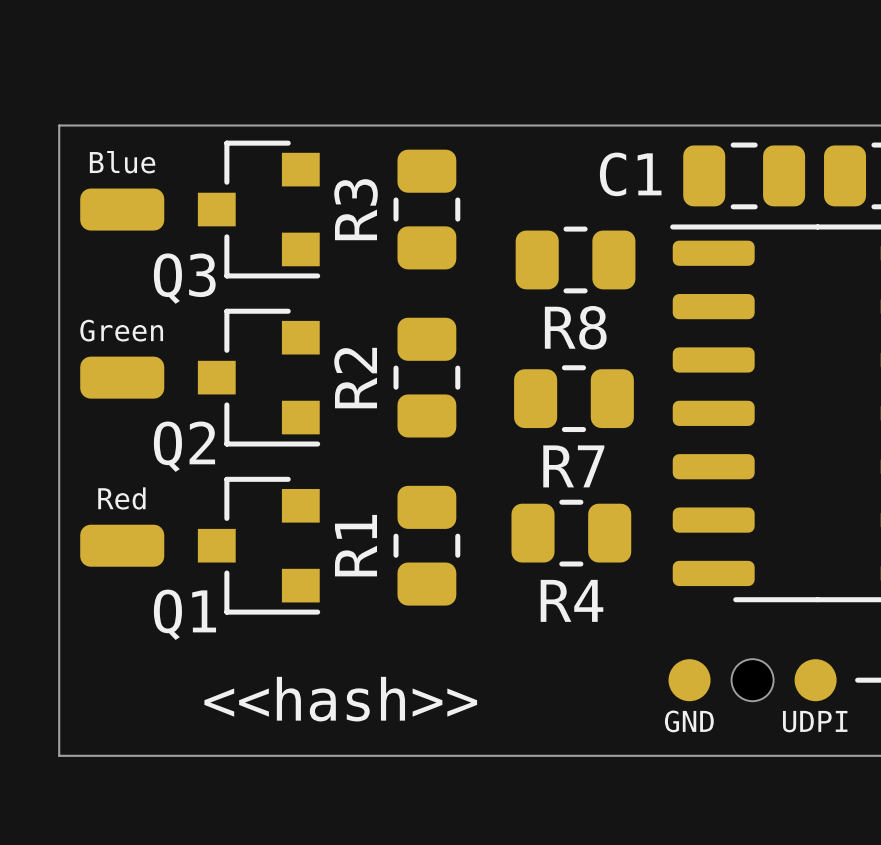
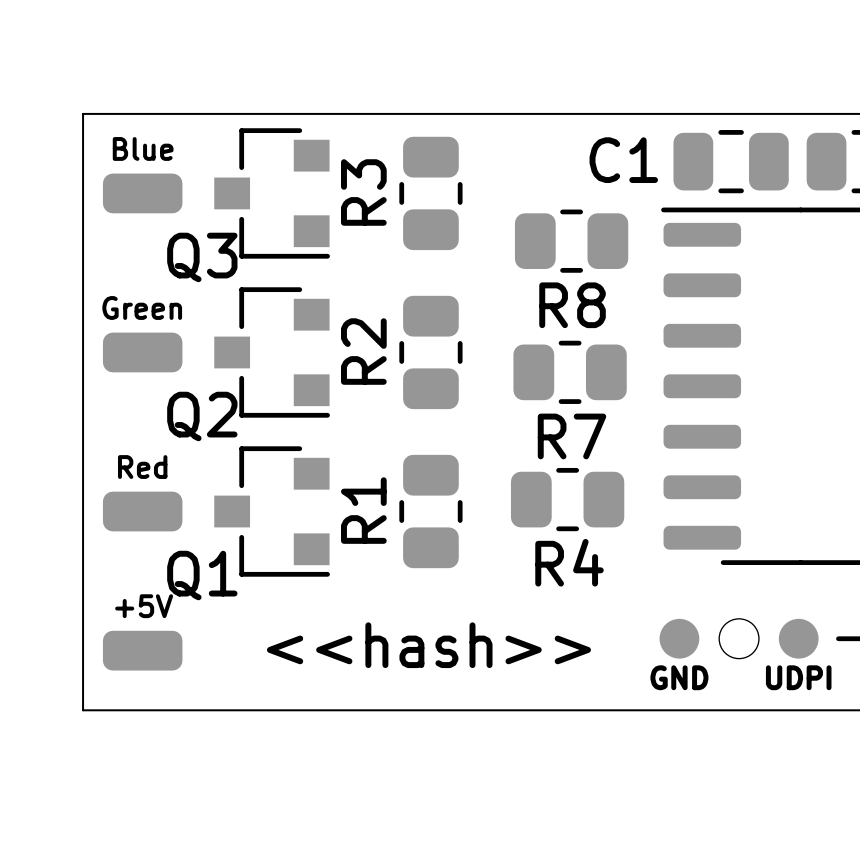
text: none -> +5V (144, 606)
part: none -> (142, 650)
text position: <<hash>> (340, 699) -> <<hash>> (428, 645)

